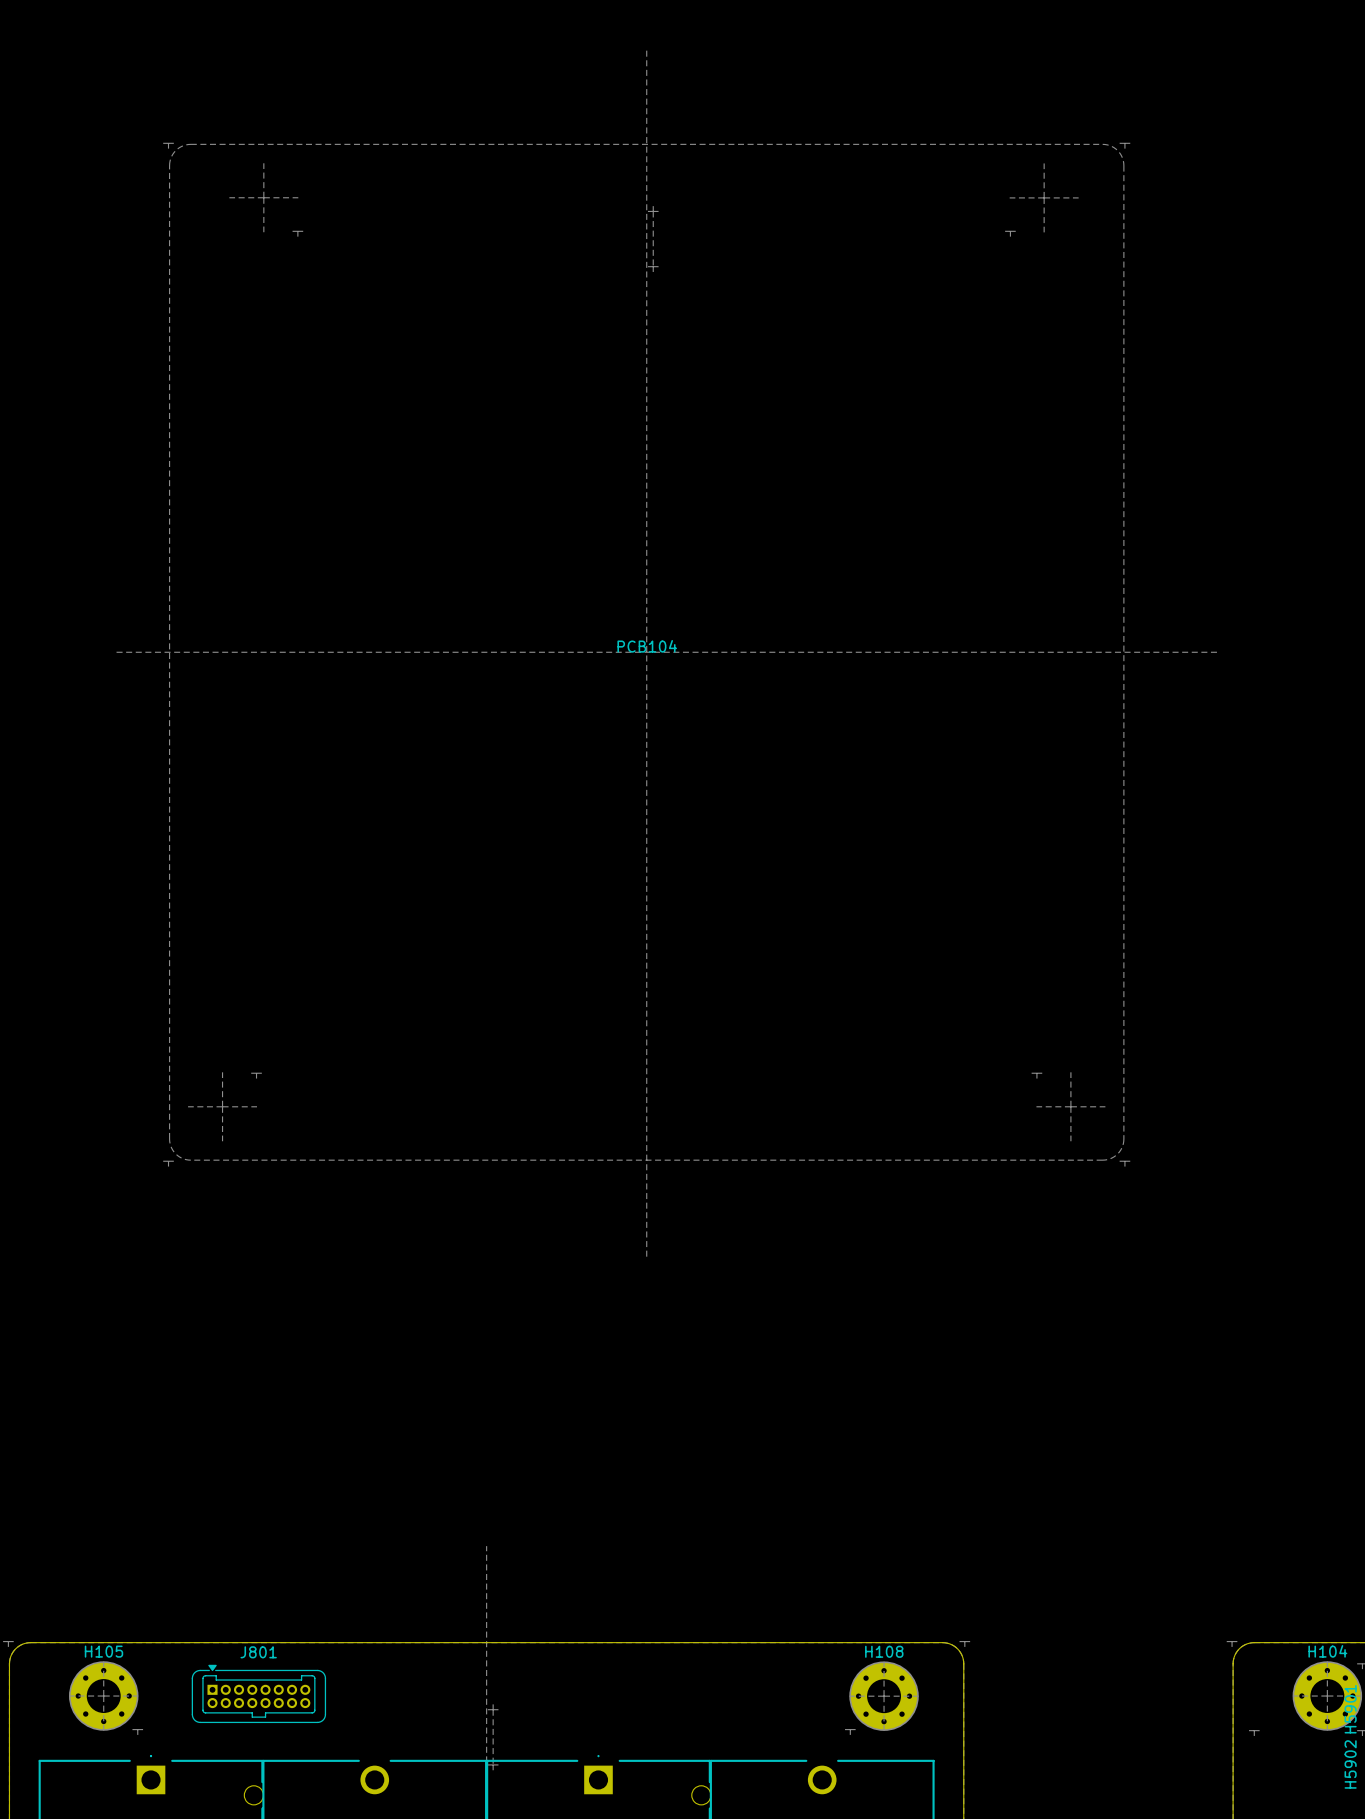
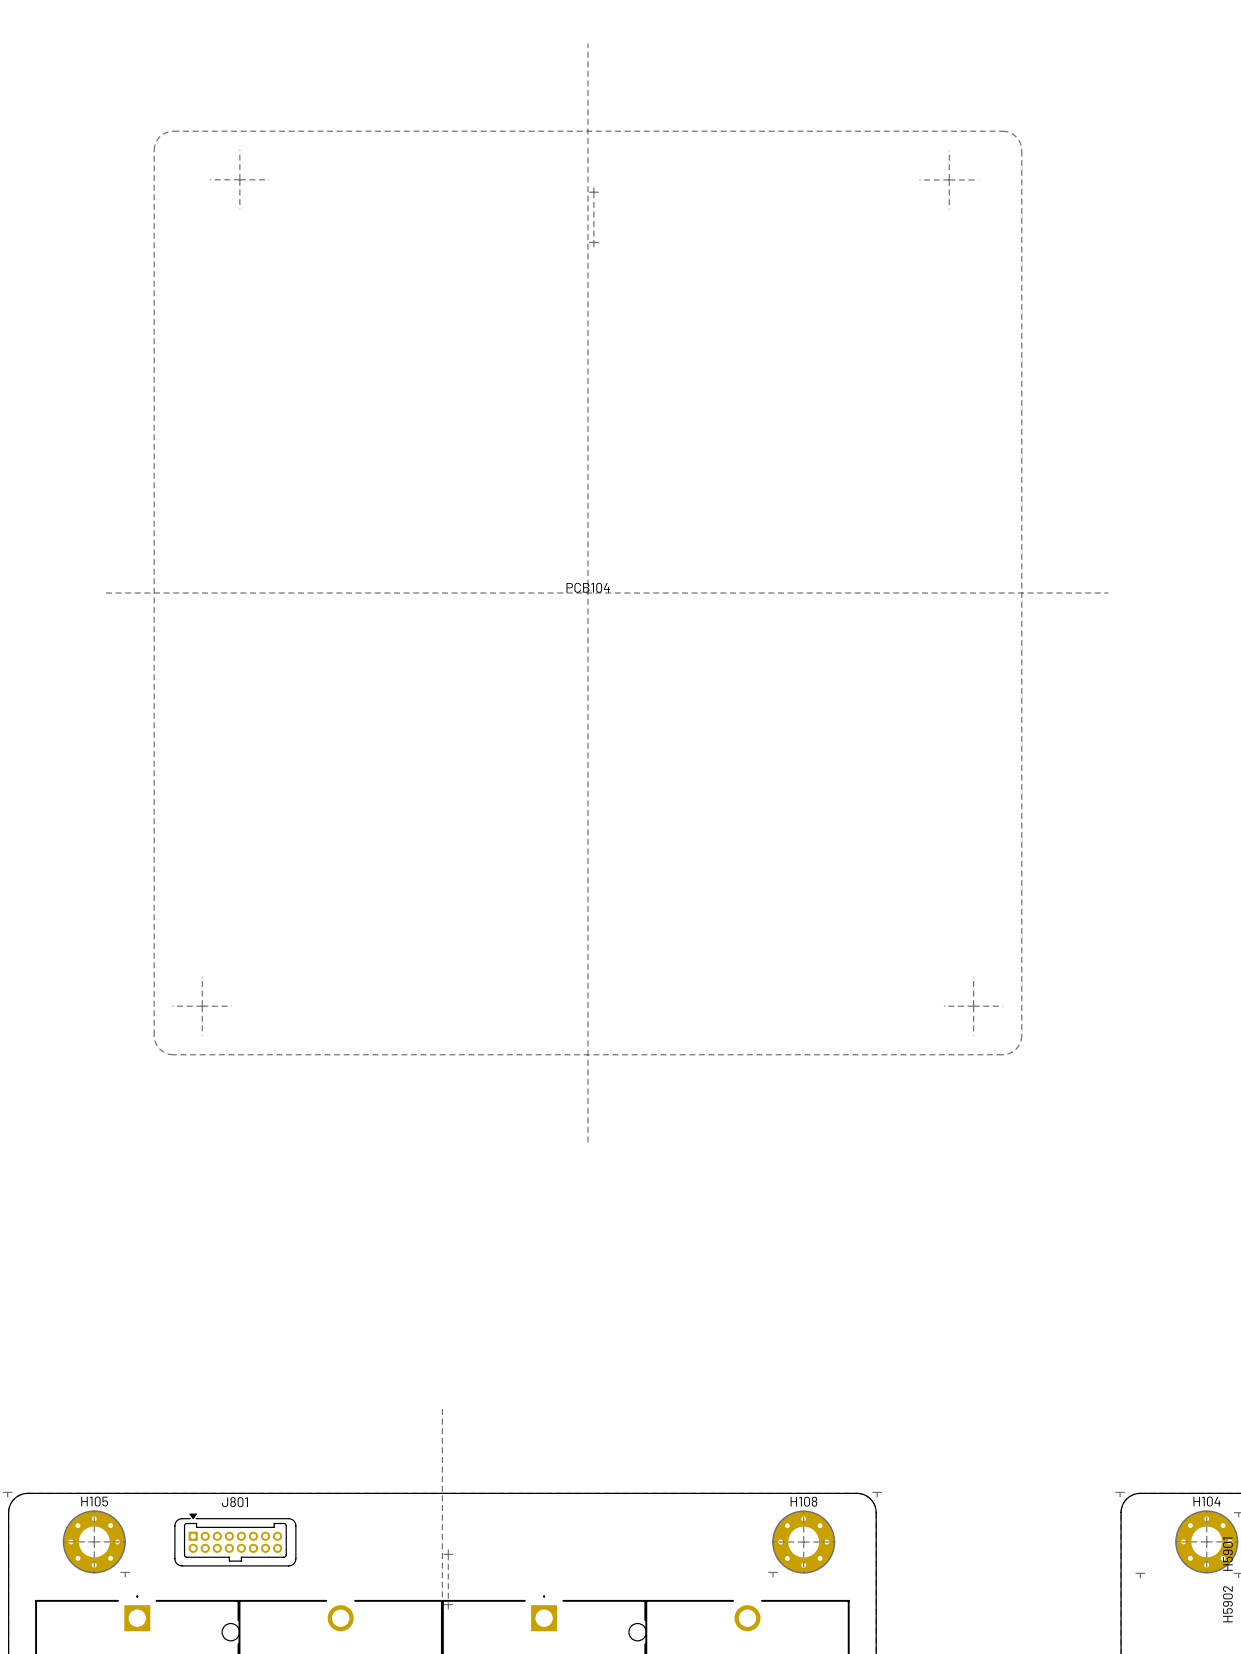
PCB104 footprint: [116, 47, 1220, 1258] -> [105, 43, 1110, 1143]

